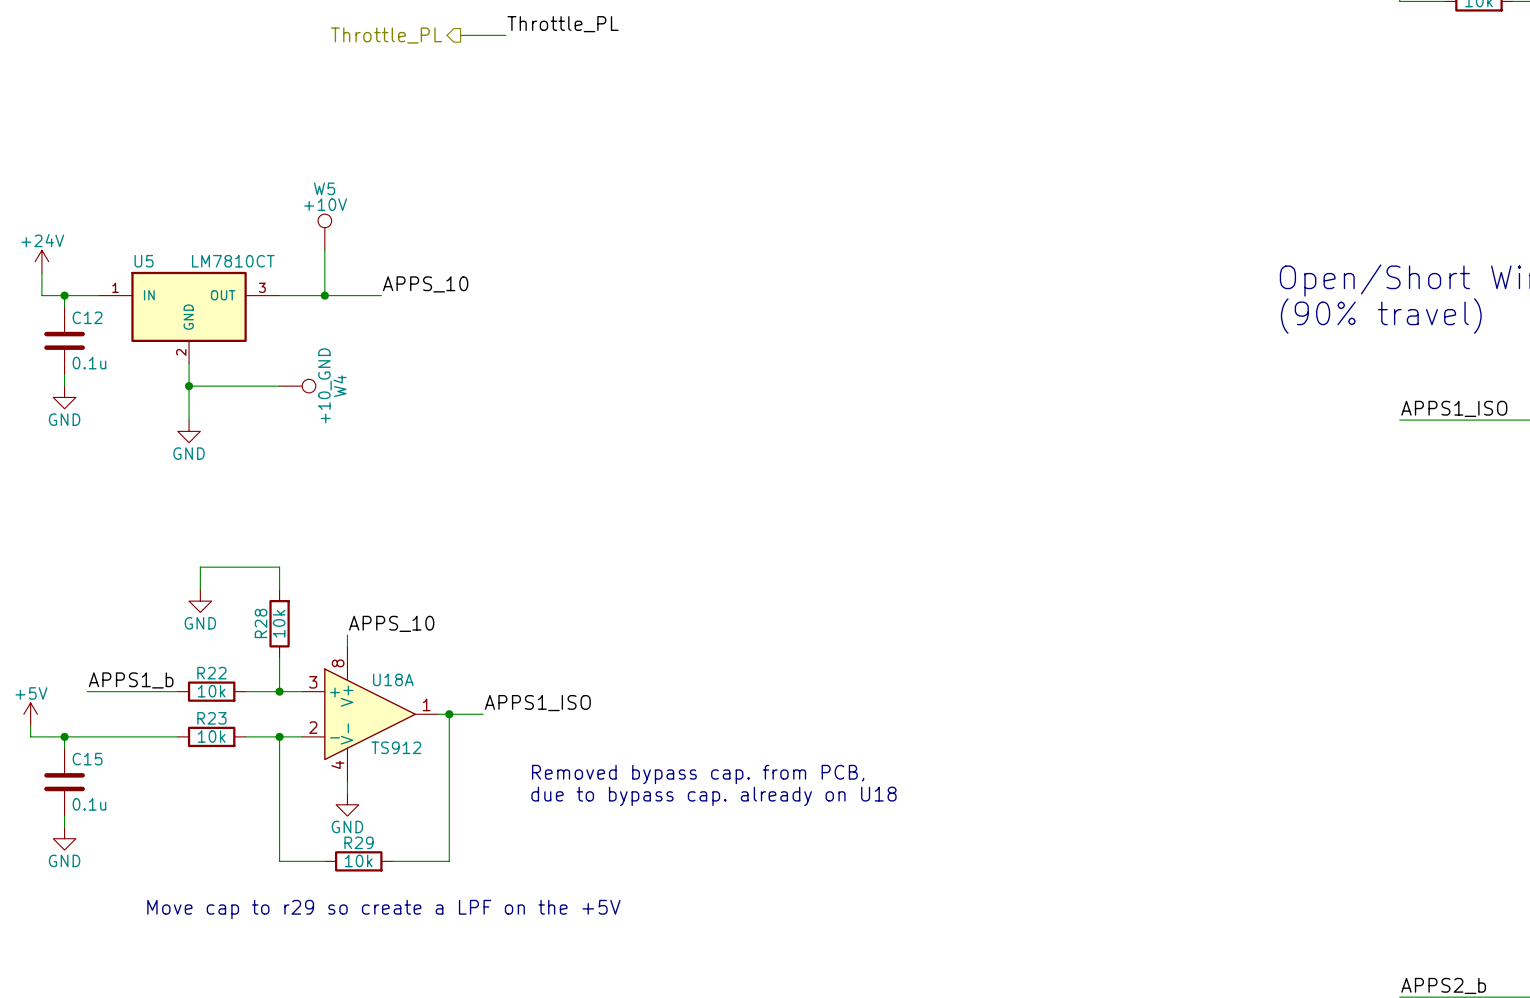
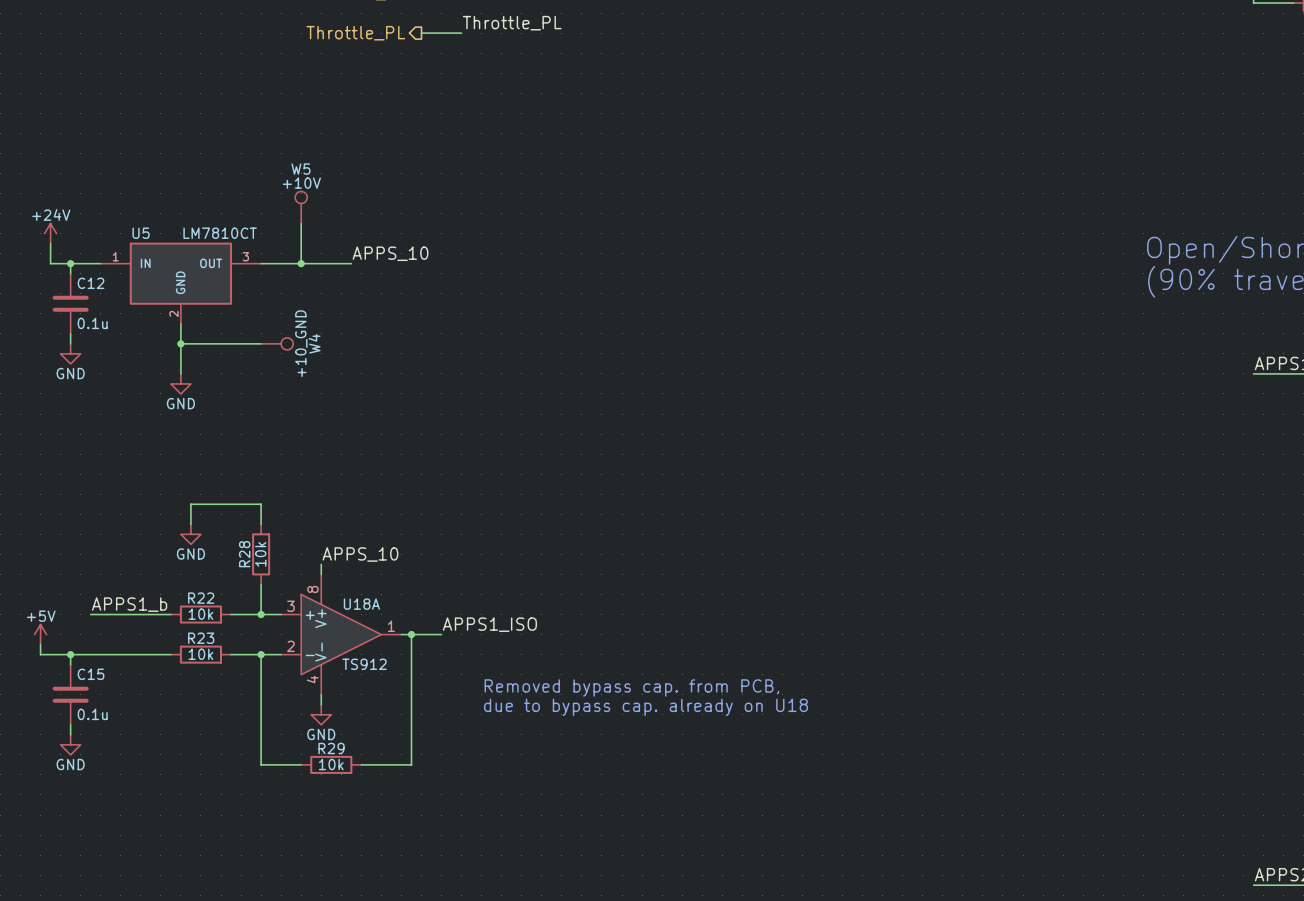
text: Move cap to r29 so create a LPF on the +5V (383, 909) -> none

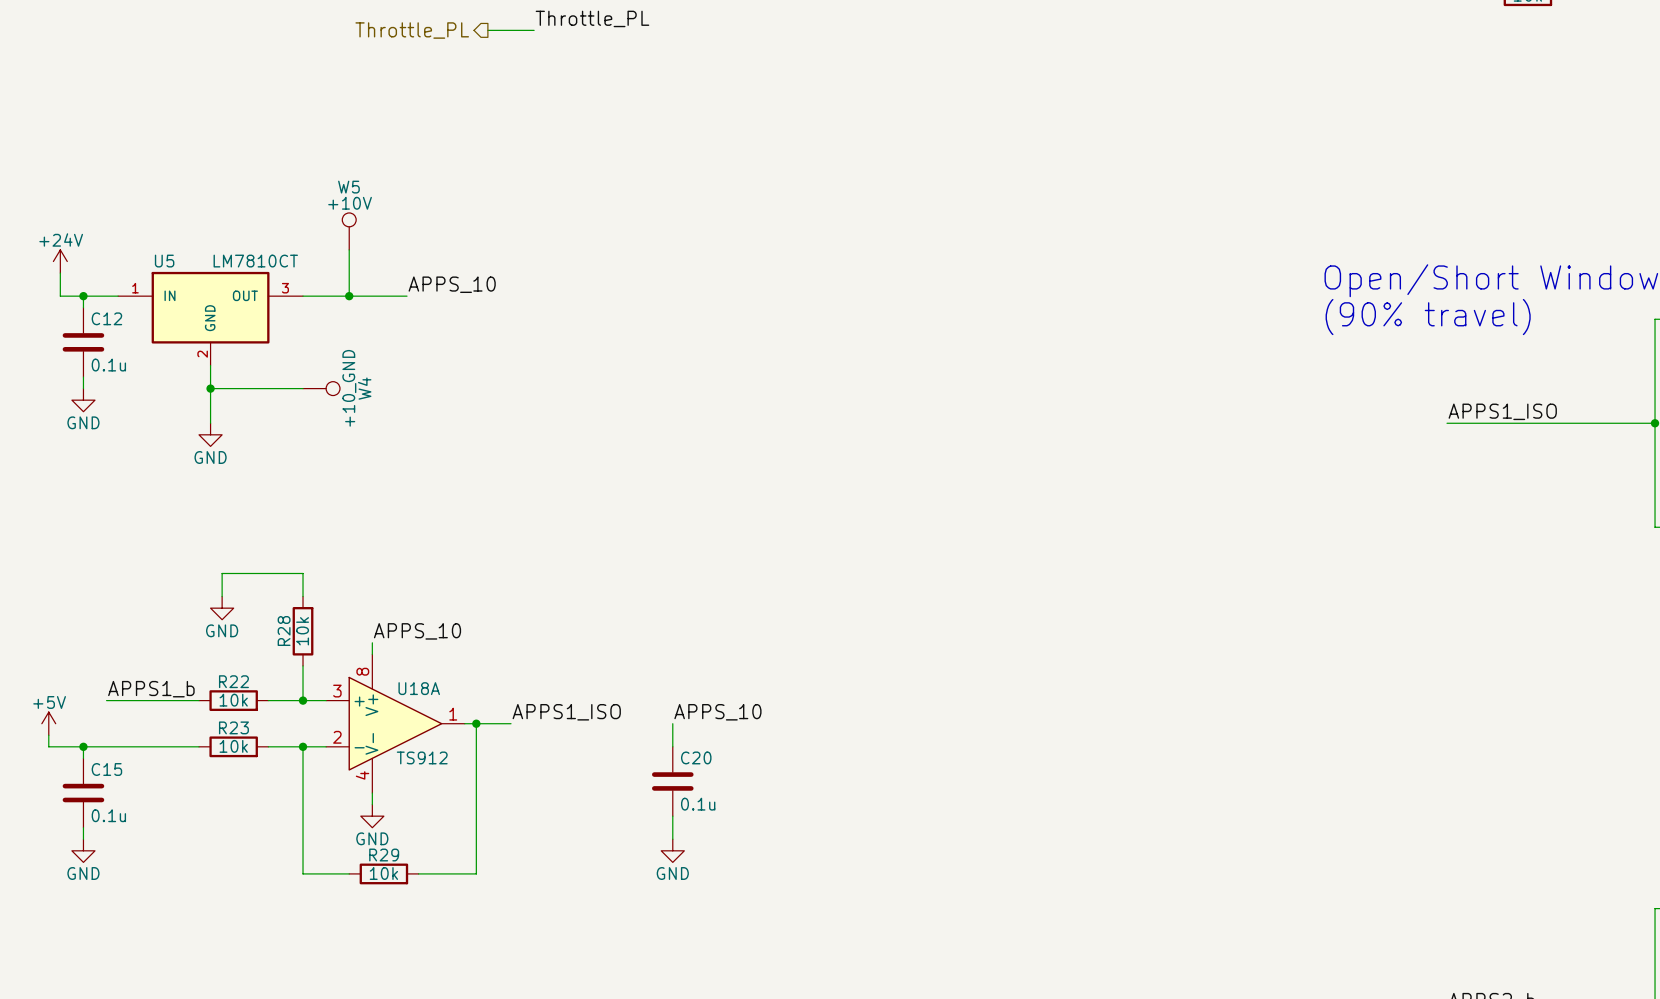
label: none -> APPS_10 (717, 712)
wire: none -> (672, 723) (672, 746)
C20: none -> 0.1u (672, 781)
text: Removed bypass cap. from PCB, (631, 687) -> none
text: due to bypass cap. already on U18 (645, 707) -> none
wire: none -> (672, 816) (672, 839)
power symbol: none -> GND (672, 850)

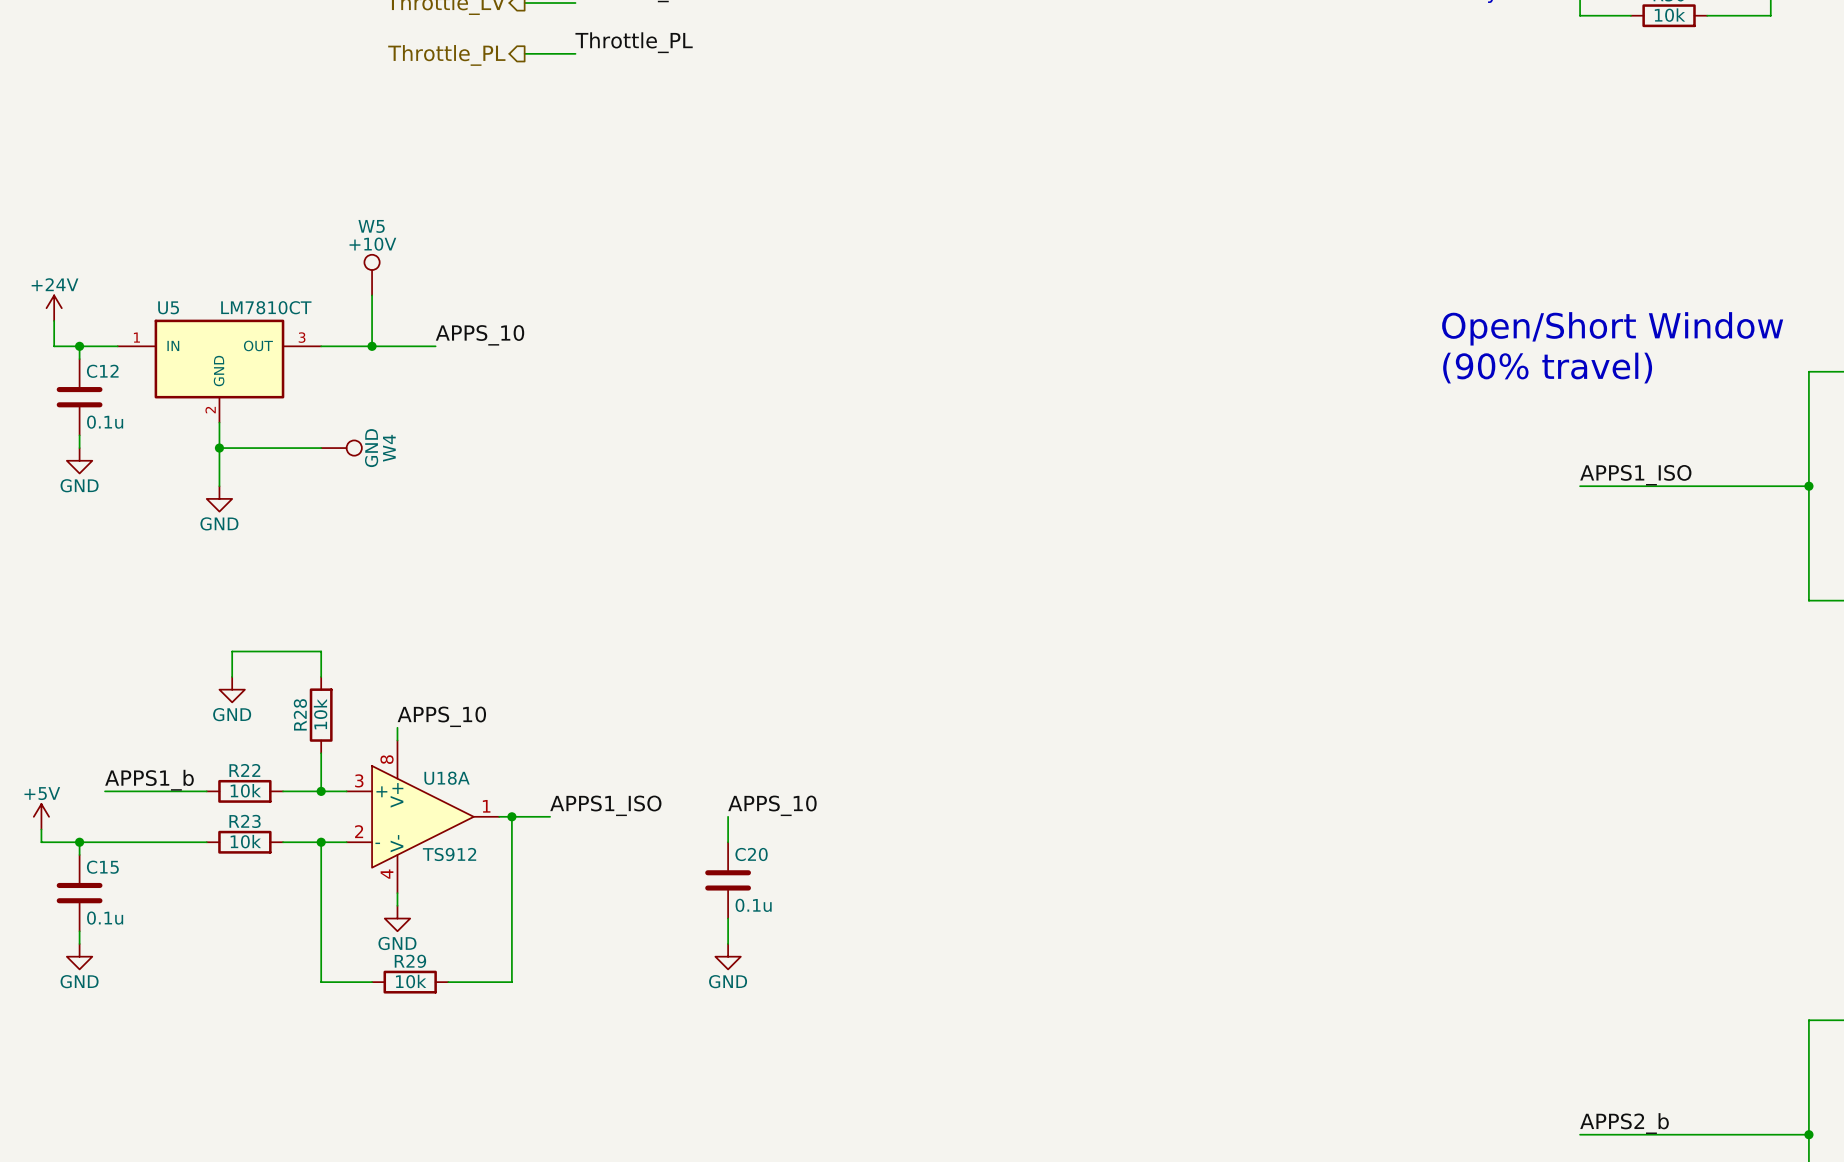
W4 value: +10_GND (349, 388) -> GND (371, 448)

